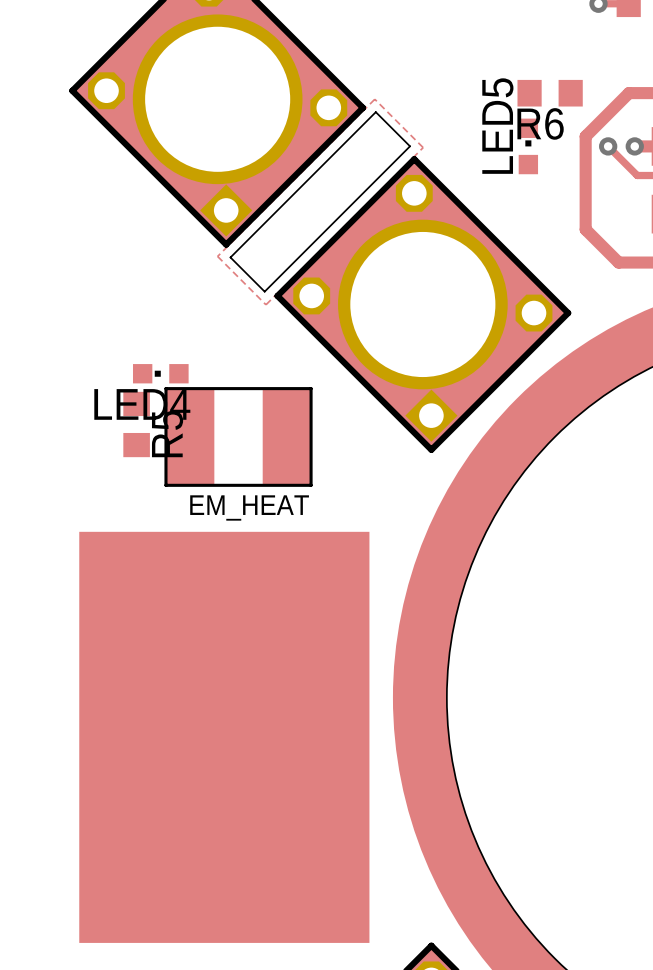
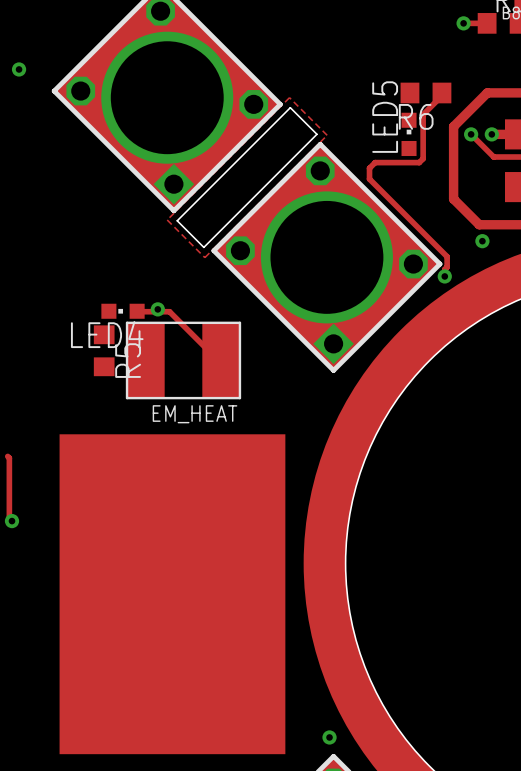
via: none -> (19, 69)
track: none -> (444, 92) (423, 114) (423, 158) (419, 162) (375, 162) (369, 168) (369, 179) (447, 256) (444, 276)
via: none -> (482, 241)
via: none -> (444, 276)
via: none -> (157, 309)
track: none -> (137, 311) (169, 311) (218, 361) (221, 360)
track: none -> (7, 456) (9, 458) (9, 518) (11, 521)
via: none -> (11, 521)
via: none -> (329, 737)

